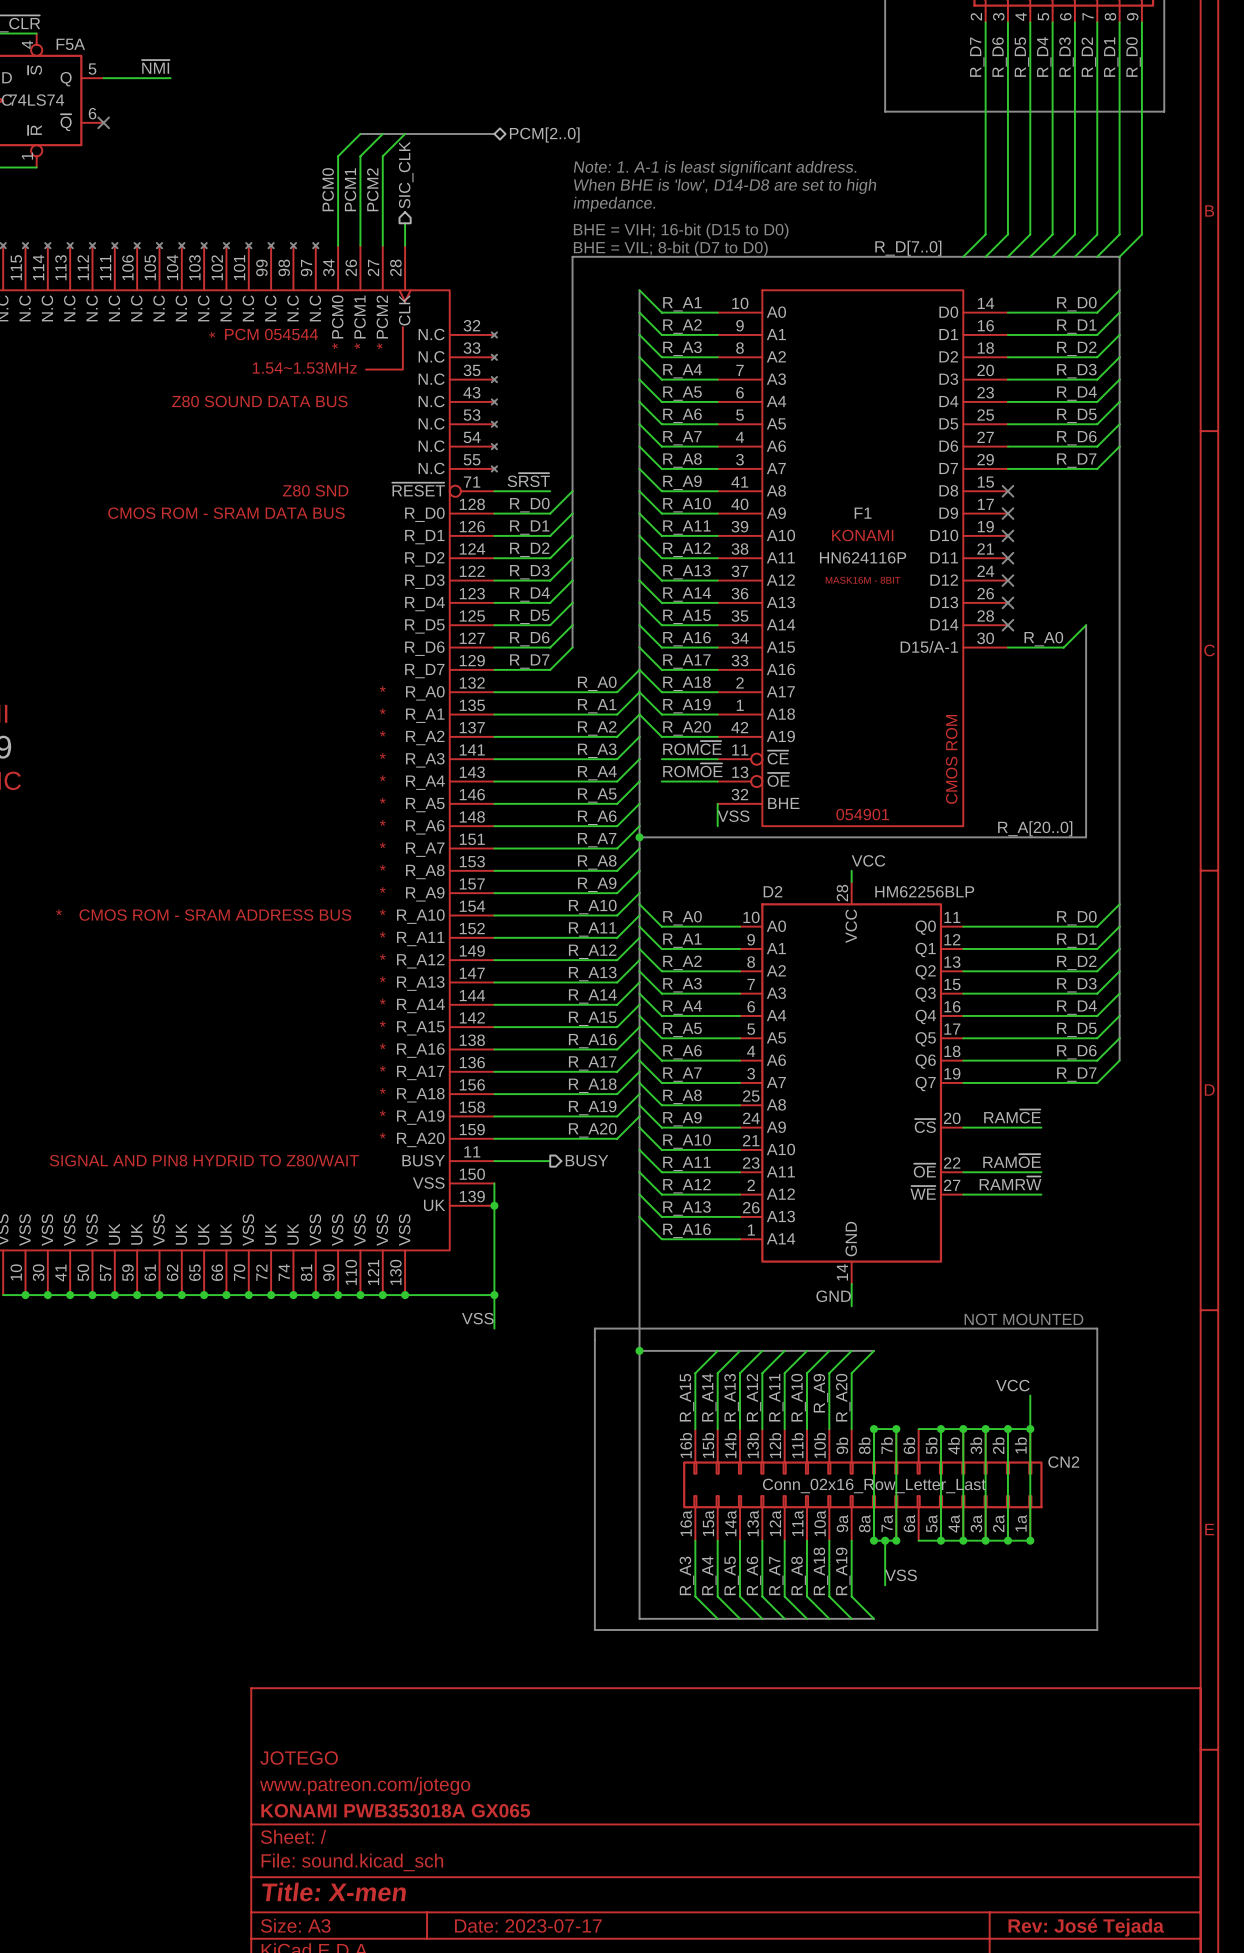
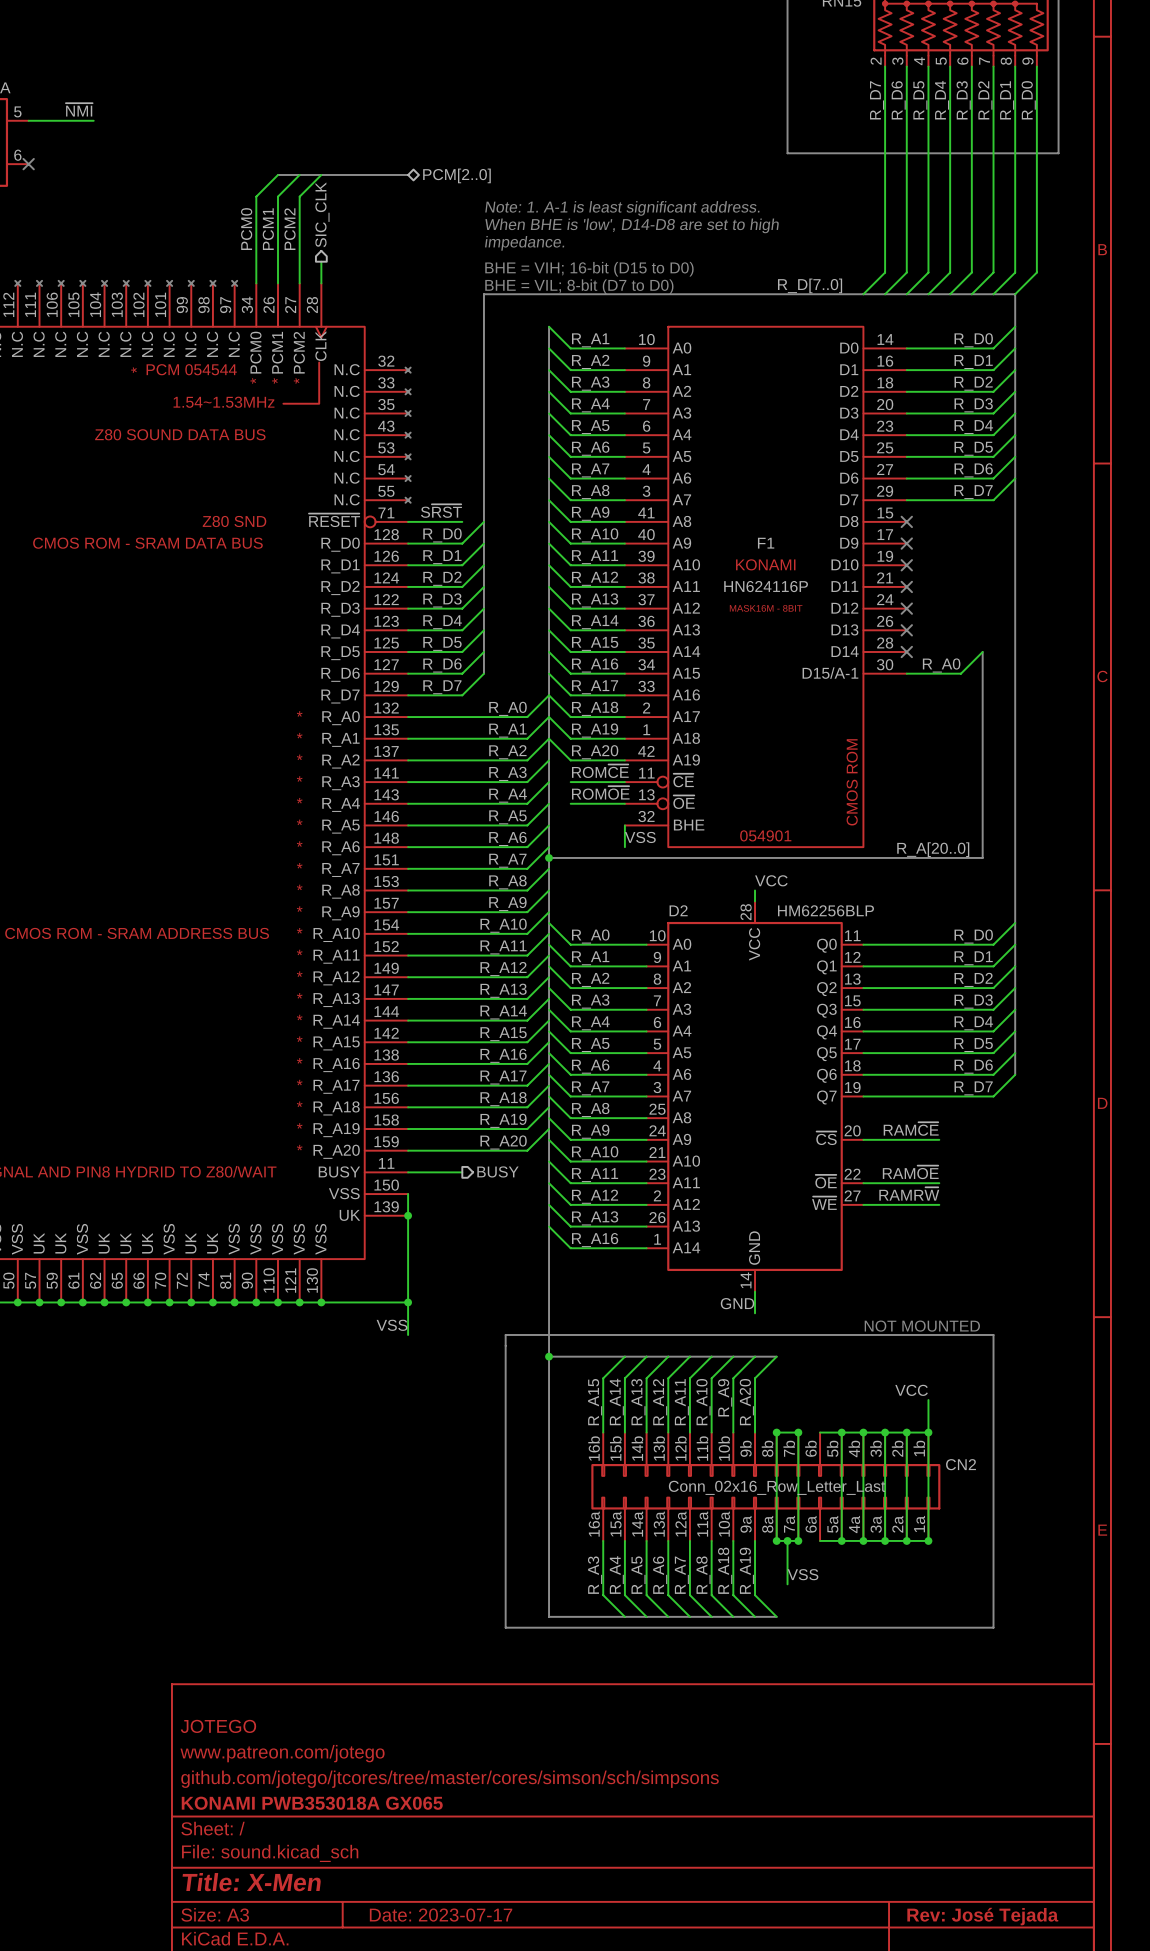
title block: none -> JOTEGO (218, 1726)
title block: JOTEGO (299, 1758) -> www.patreon.com/jotego (282, 1753)
title block: www.patreon.com/jotego (365, 1786) -> github.com/jotego/jtcores/tree/master/cores/simson/sch/simpsons (450, 1779)
title block: Title: X-men (334, 1892) -> Title: X-Men (251, 1882)

